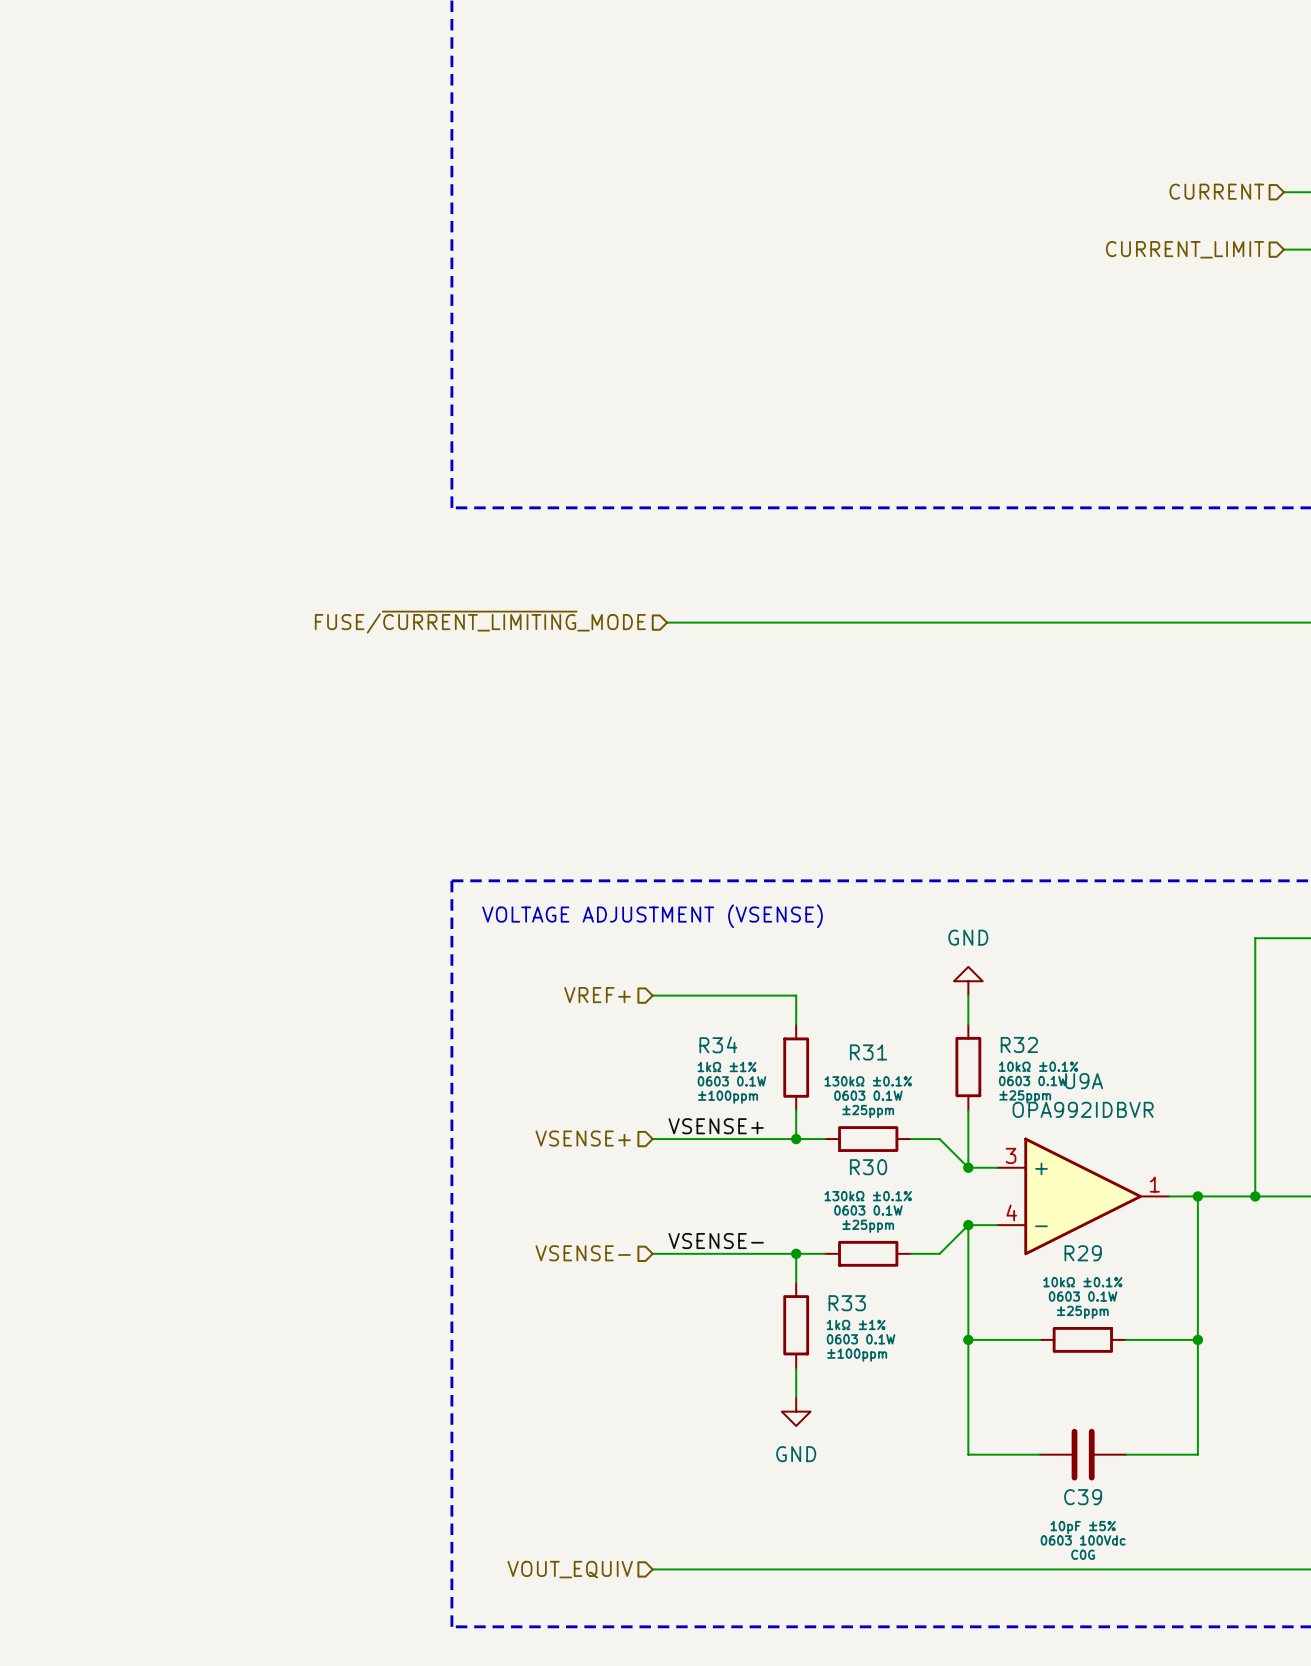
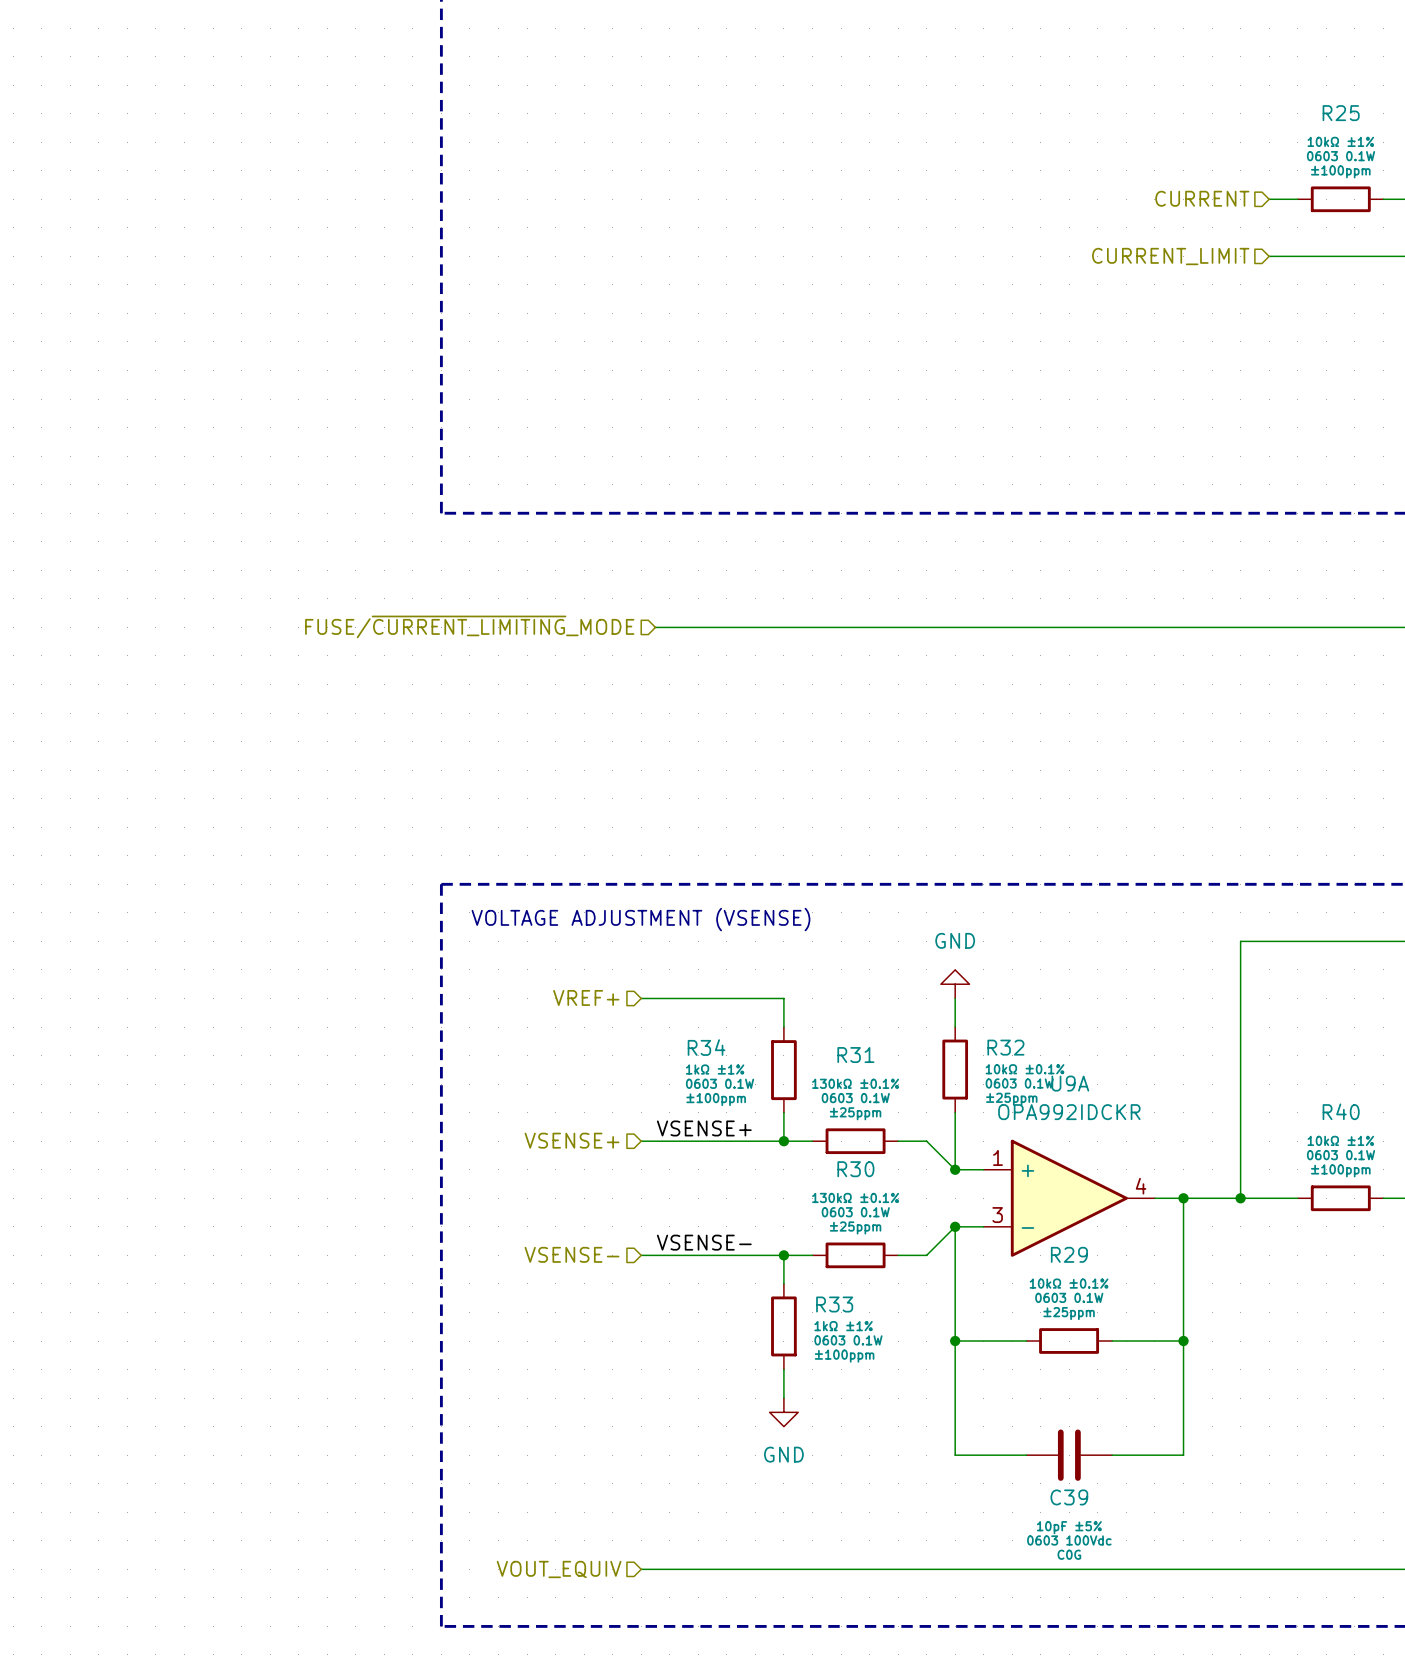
U9A value: OPA992IDBVR (1083, 1109) -> OPA992IDCKR (1069, 1112)
U9A pin number: 3 (1011, 1155) -> 1 (997, 1157)
U9A pin number: 1 (1154, 1184) -> 4 (1141, 1186)
U9A pin number: 4 (1011, 1212) -> 3 (997, 1215)

